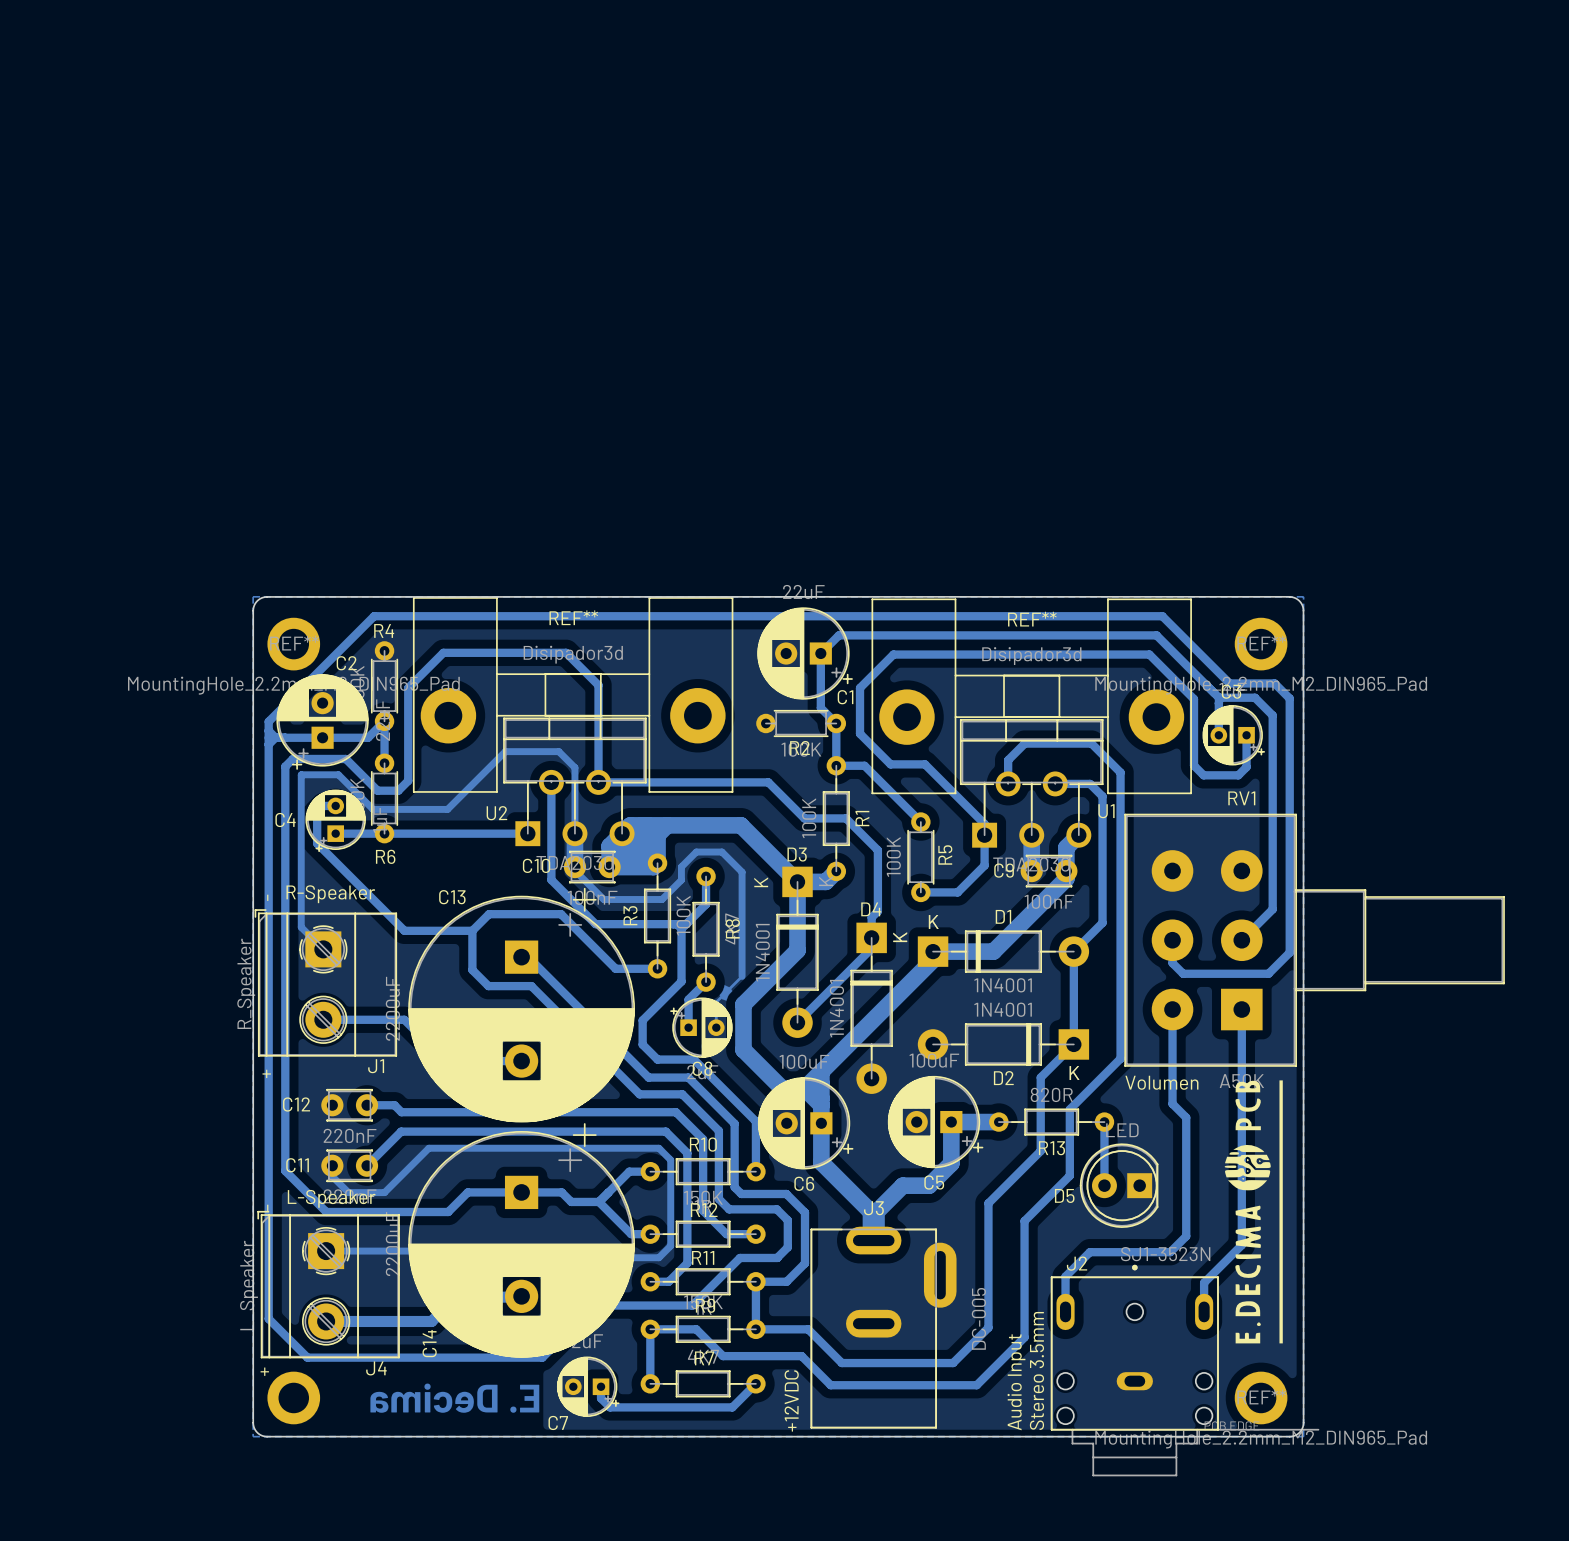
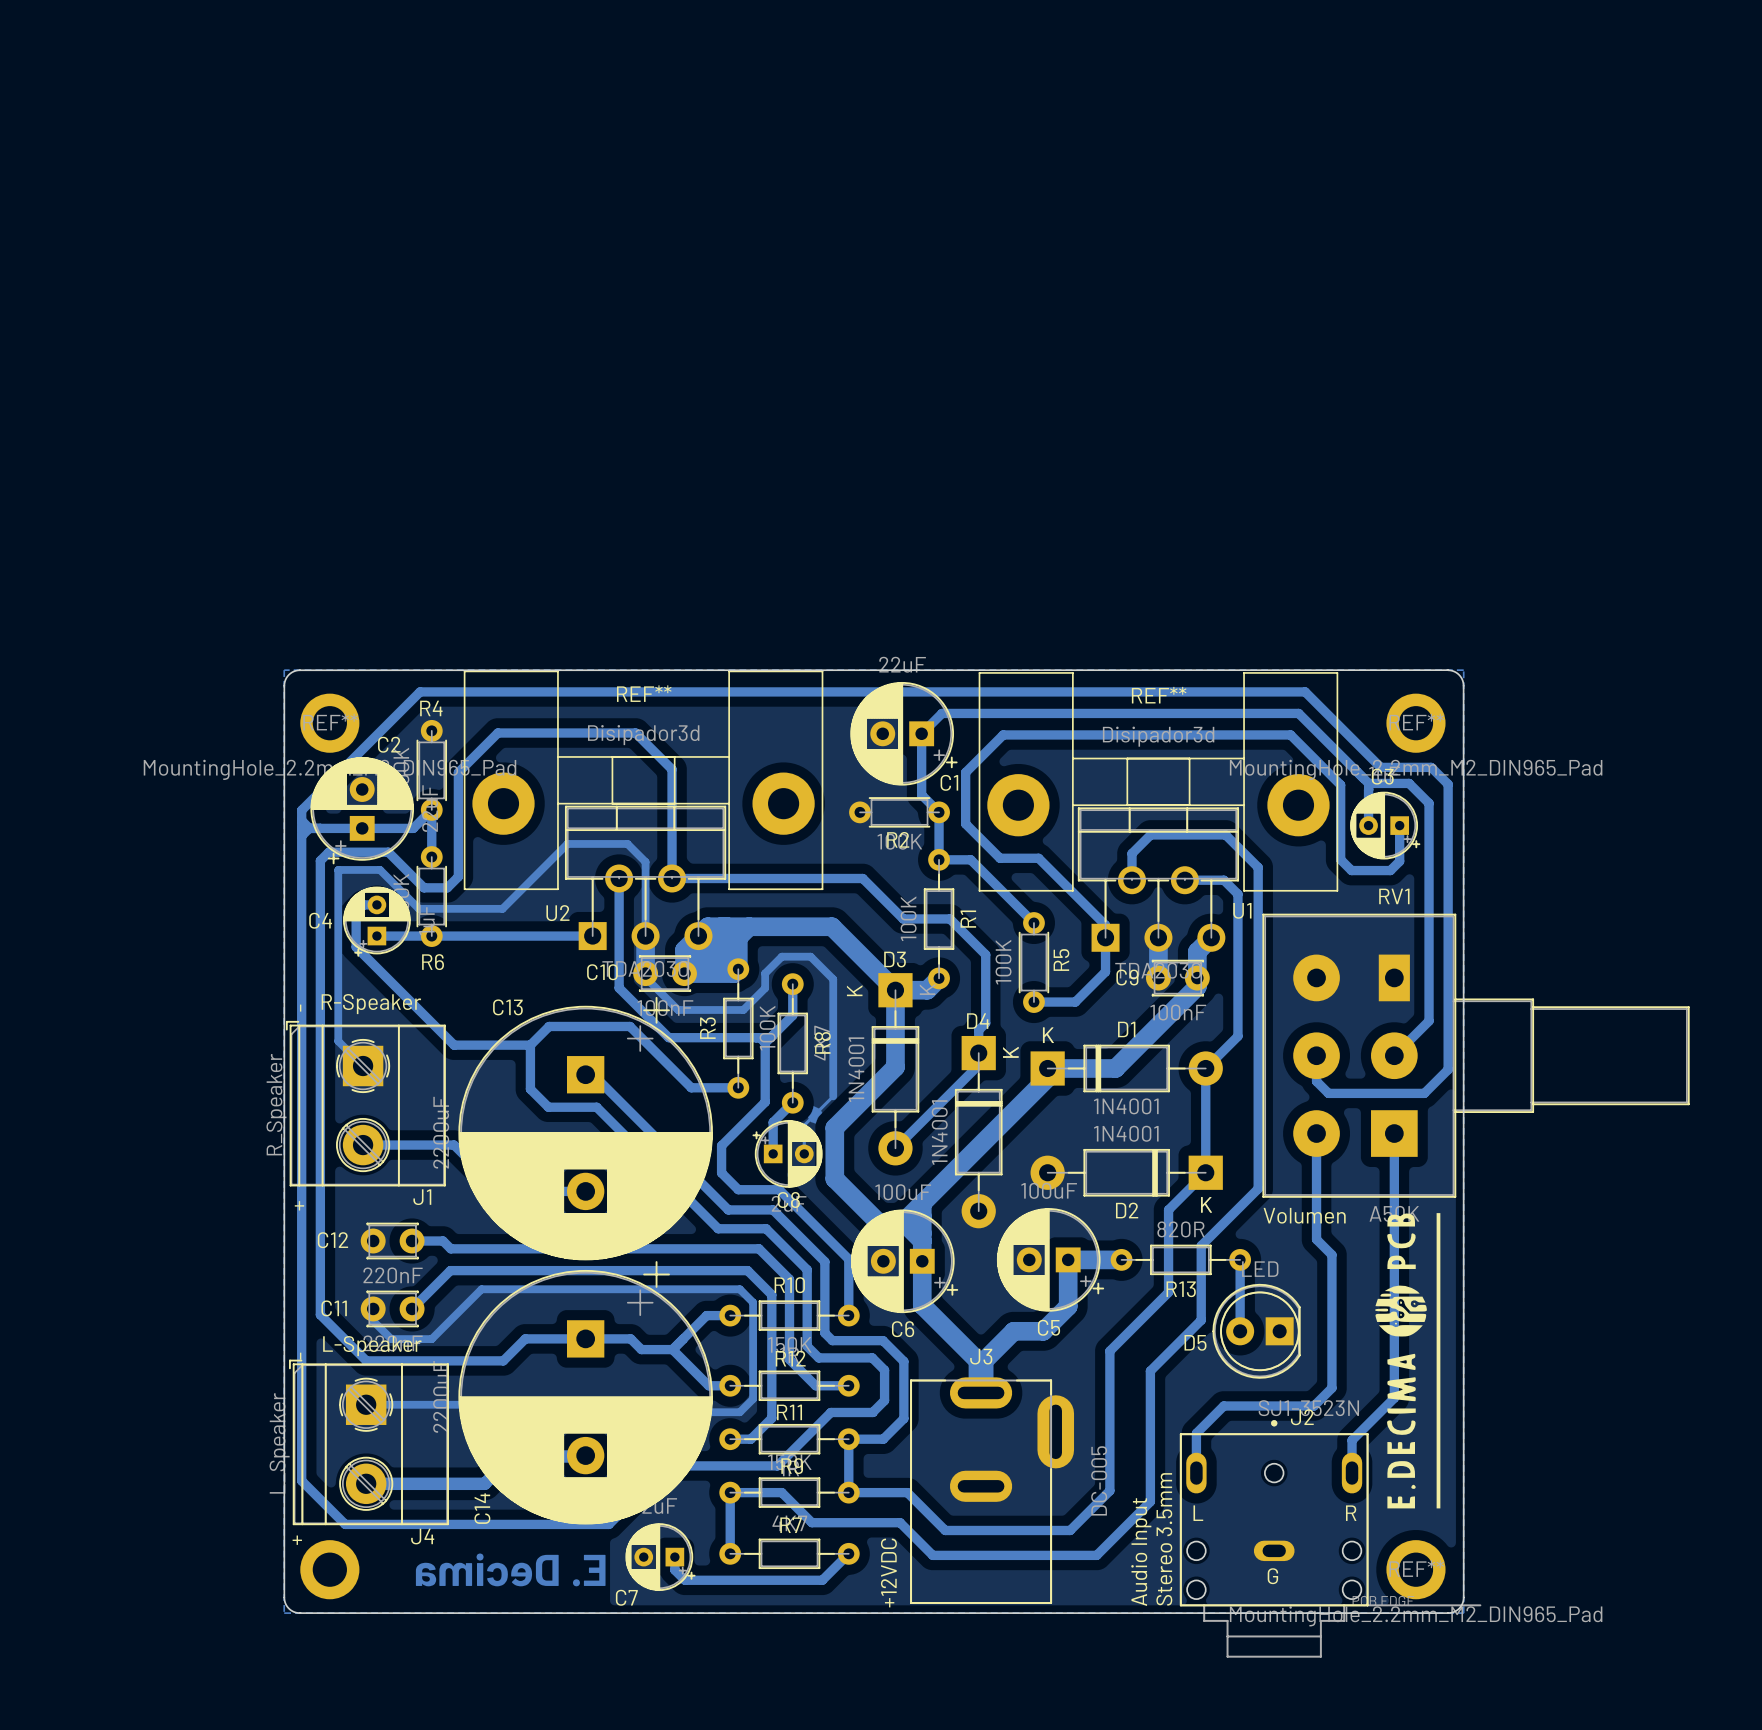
RV1 footprint: [1124, 813, 1505, 1067] -> [1262, 913, 1690, 1198]
J2 name position: J2 (1077, 1263) -> J2 (1302, 1417)
text: none -> L (1198, 1513)
text: none -> R (1351, 1513)
text: none -> G (1272, 1576)

